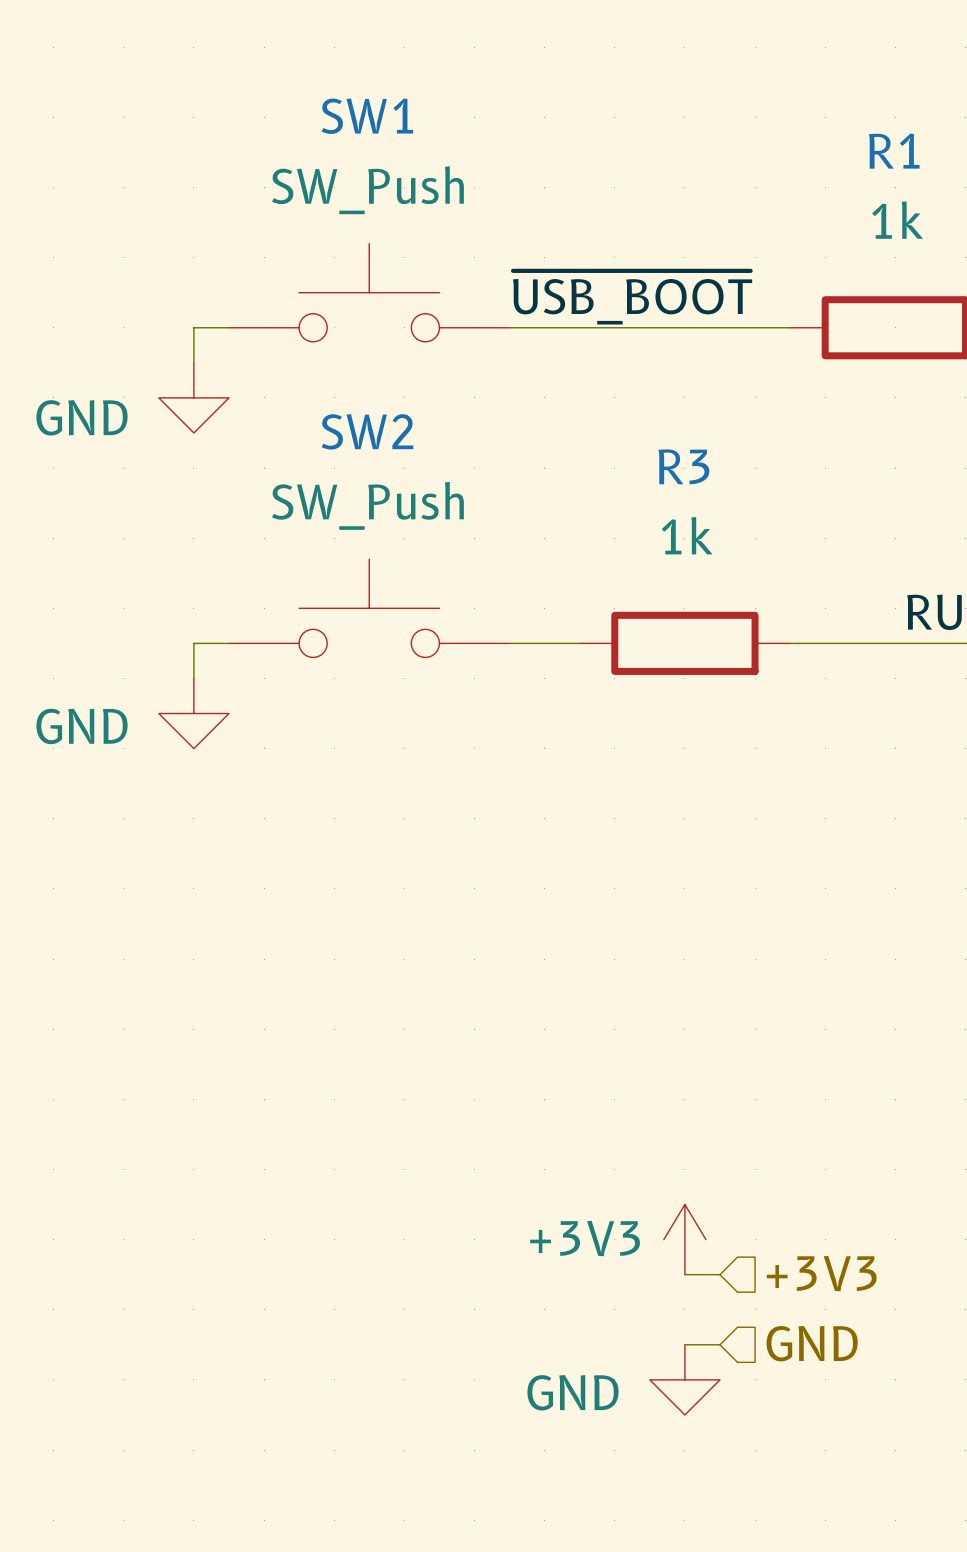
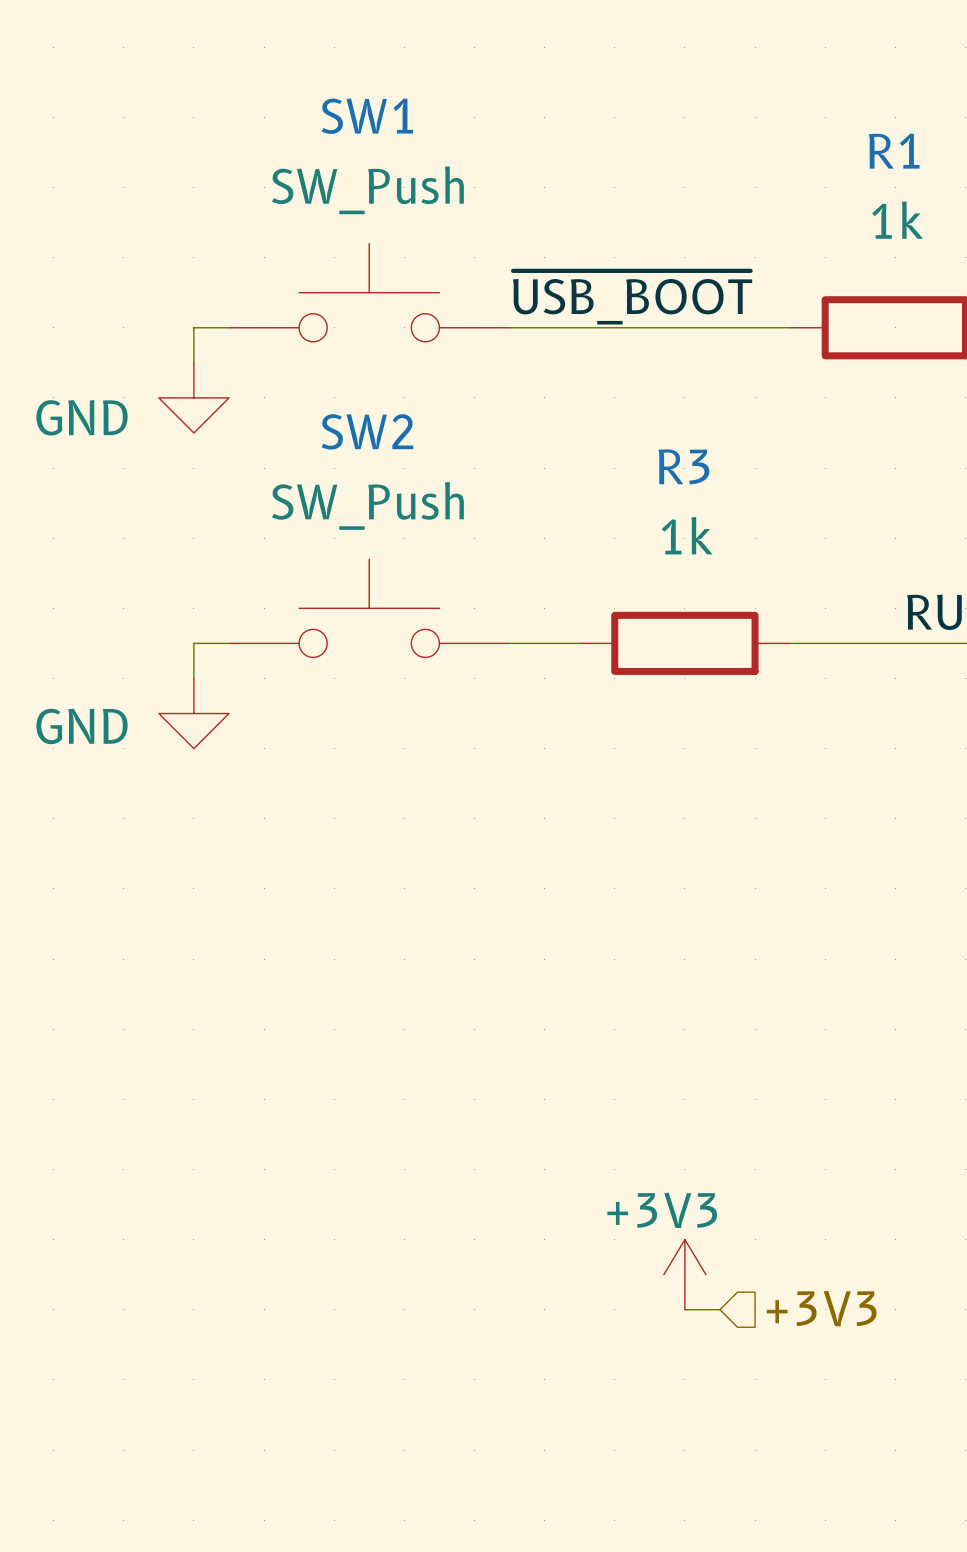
power symbol text position: +3V3 (585, 1238) -> +3V3 (662, 1210)
power symbol position: +3V3 (684, 1239) -> +3V3 (684, 1274)
hierarchical label position: +3V3 (821, 1273) -> +3V3 (821, 1308)
wire: (684, 1274) (719, 1274) -> none
hierarchical label: GND (812, 1343) -> none
wire: (684, 1344) (719, 1344) -> (684, 1309) (719, 1309)
power symbol: GND (684, 1379) -> none

